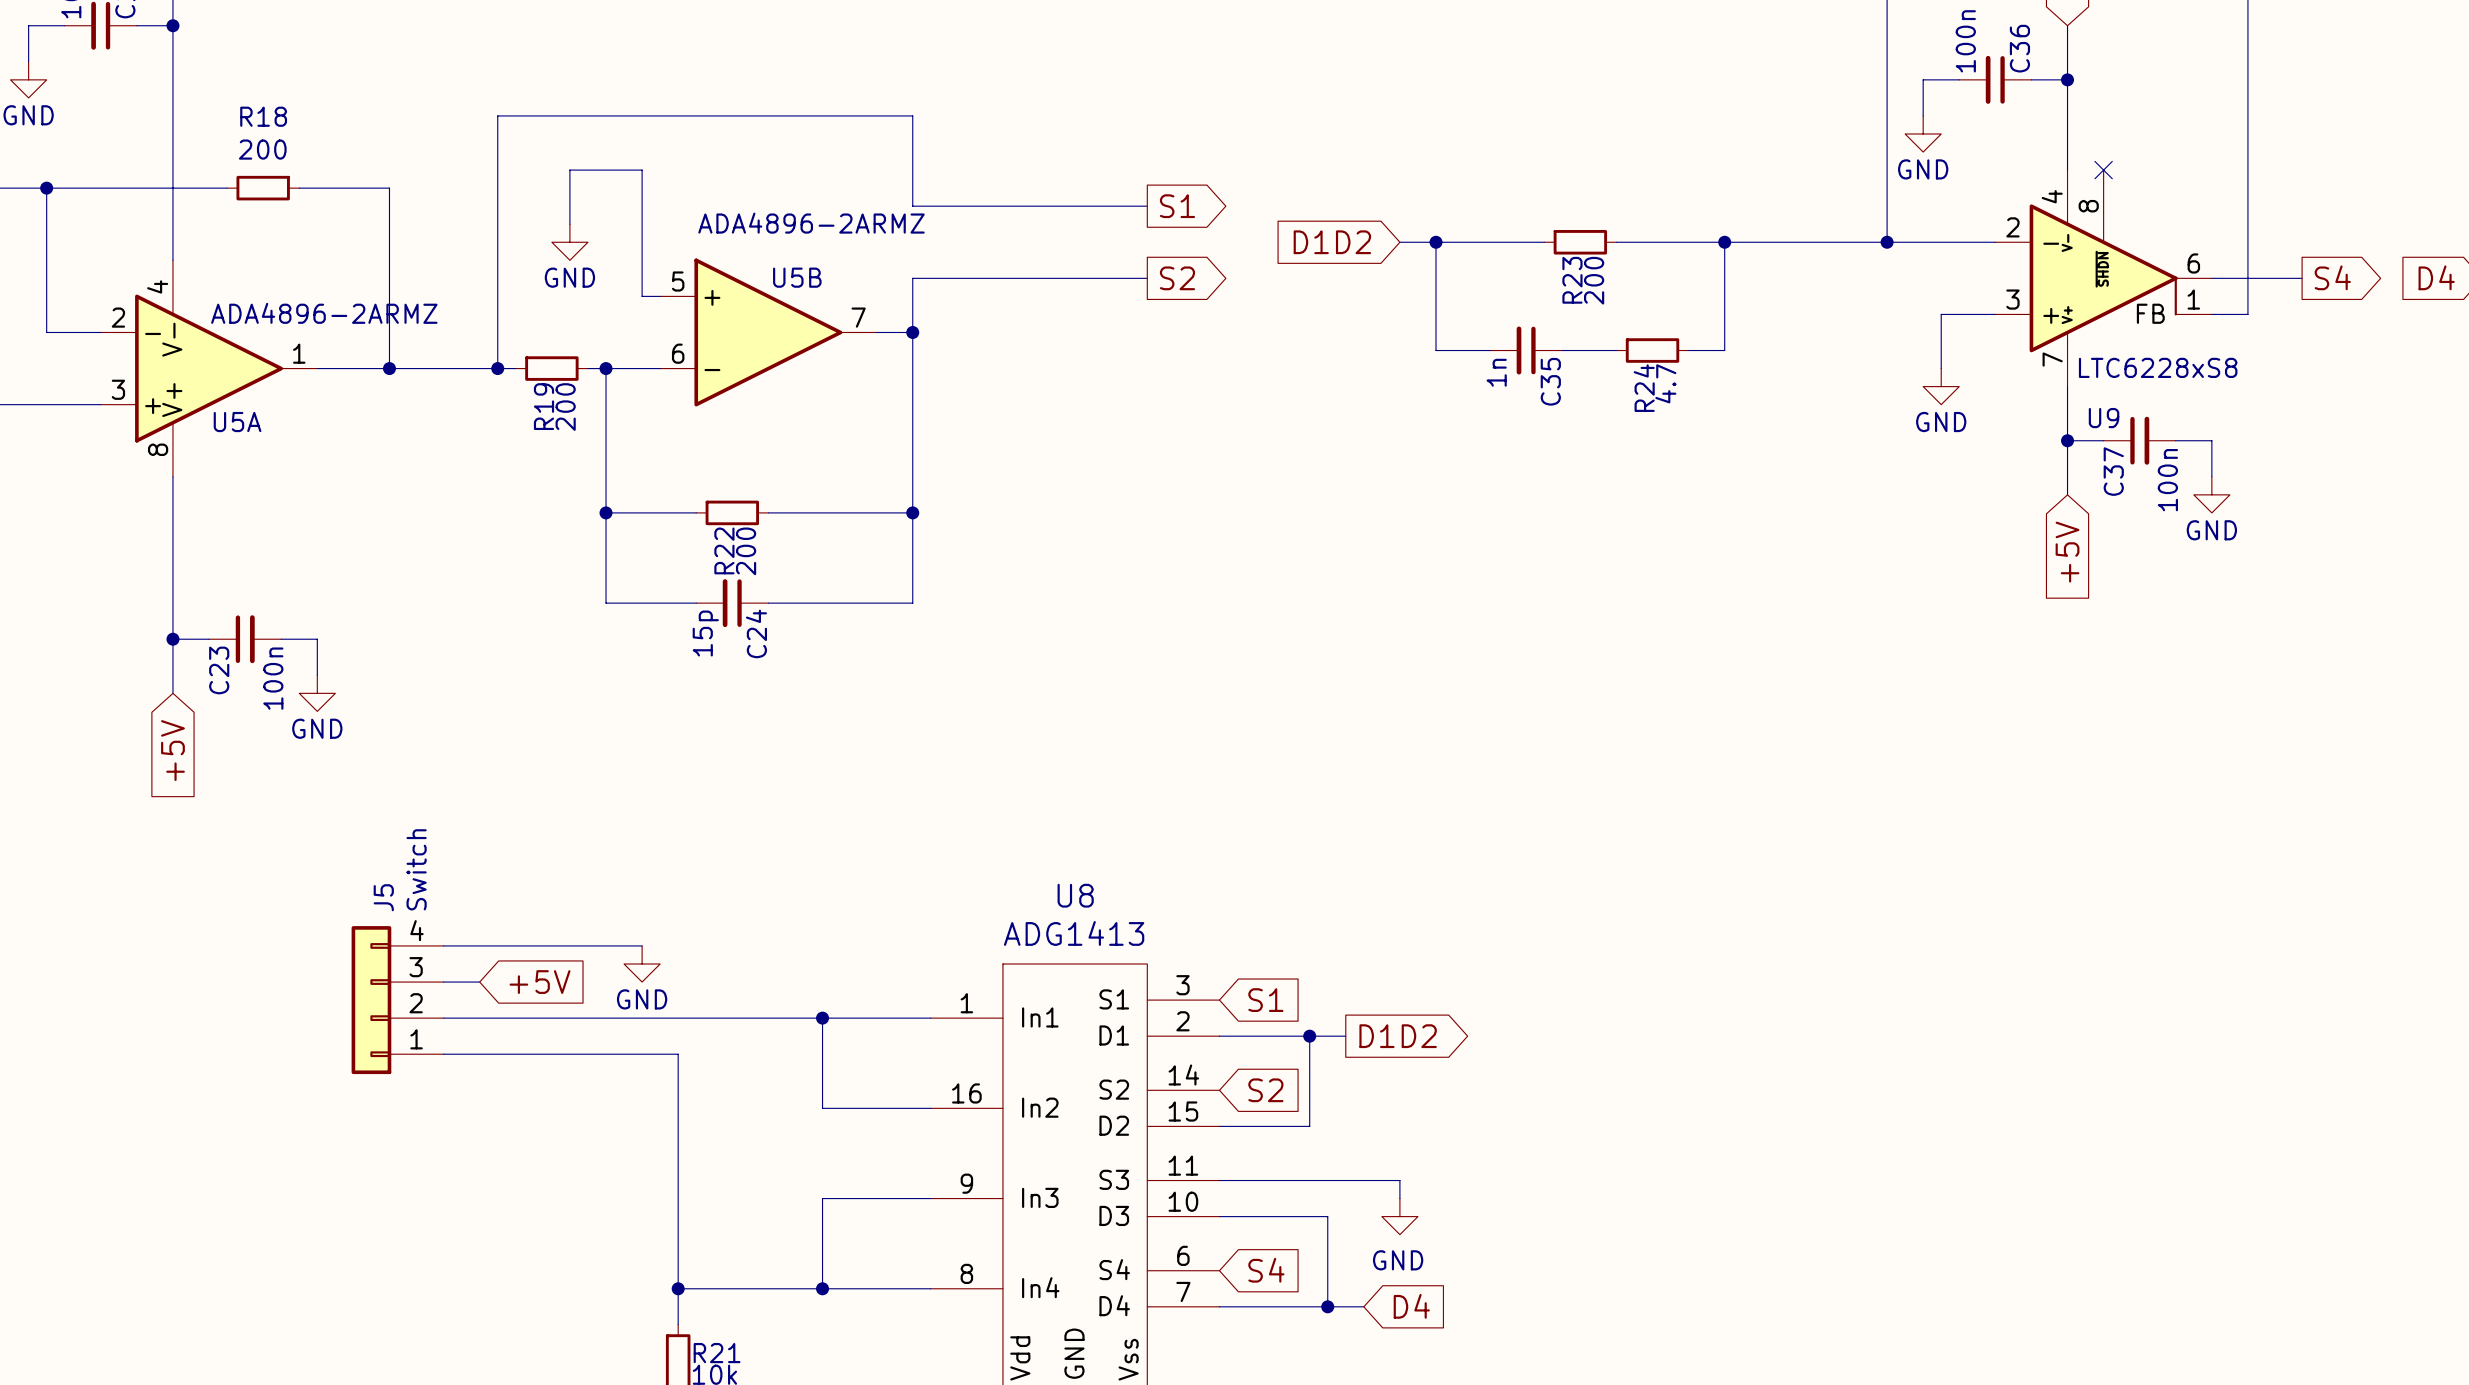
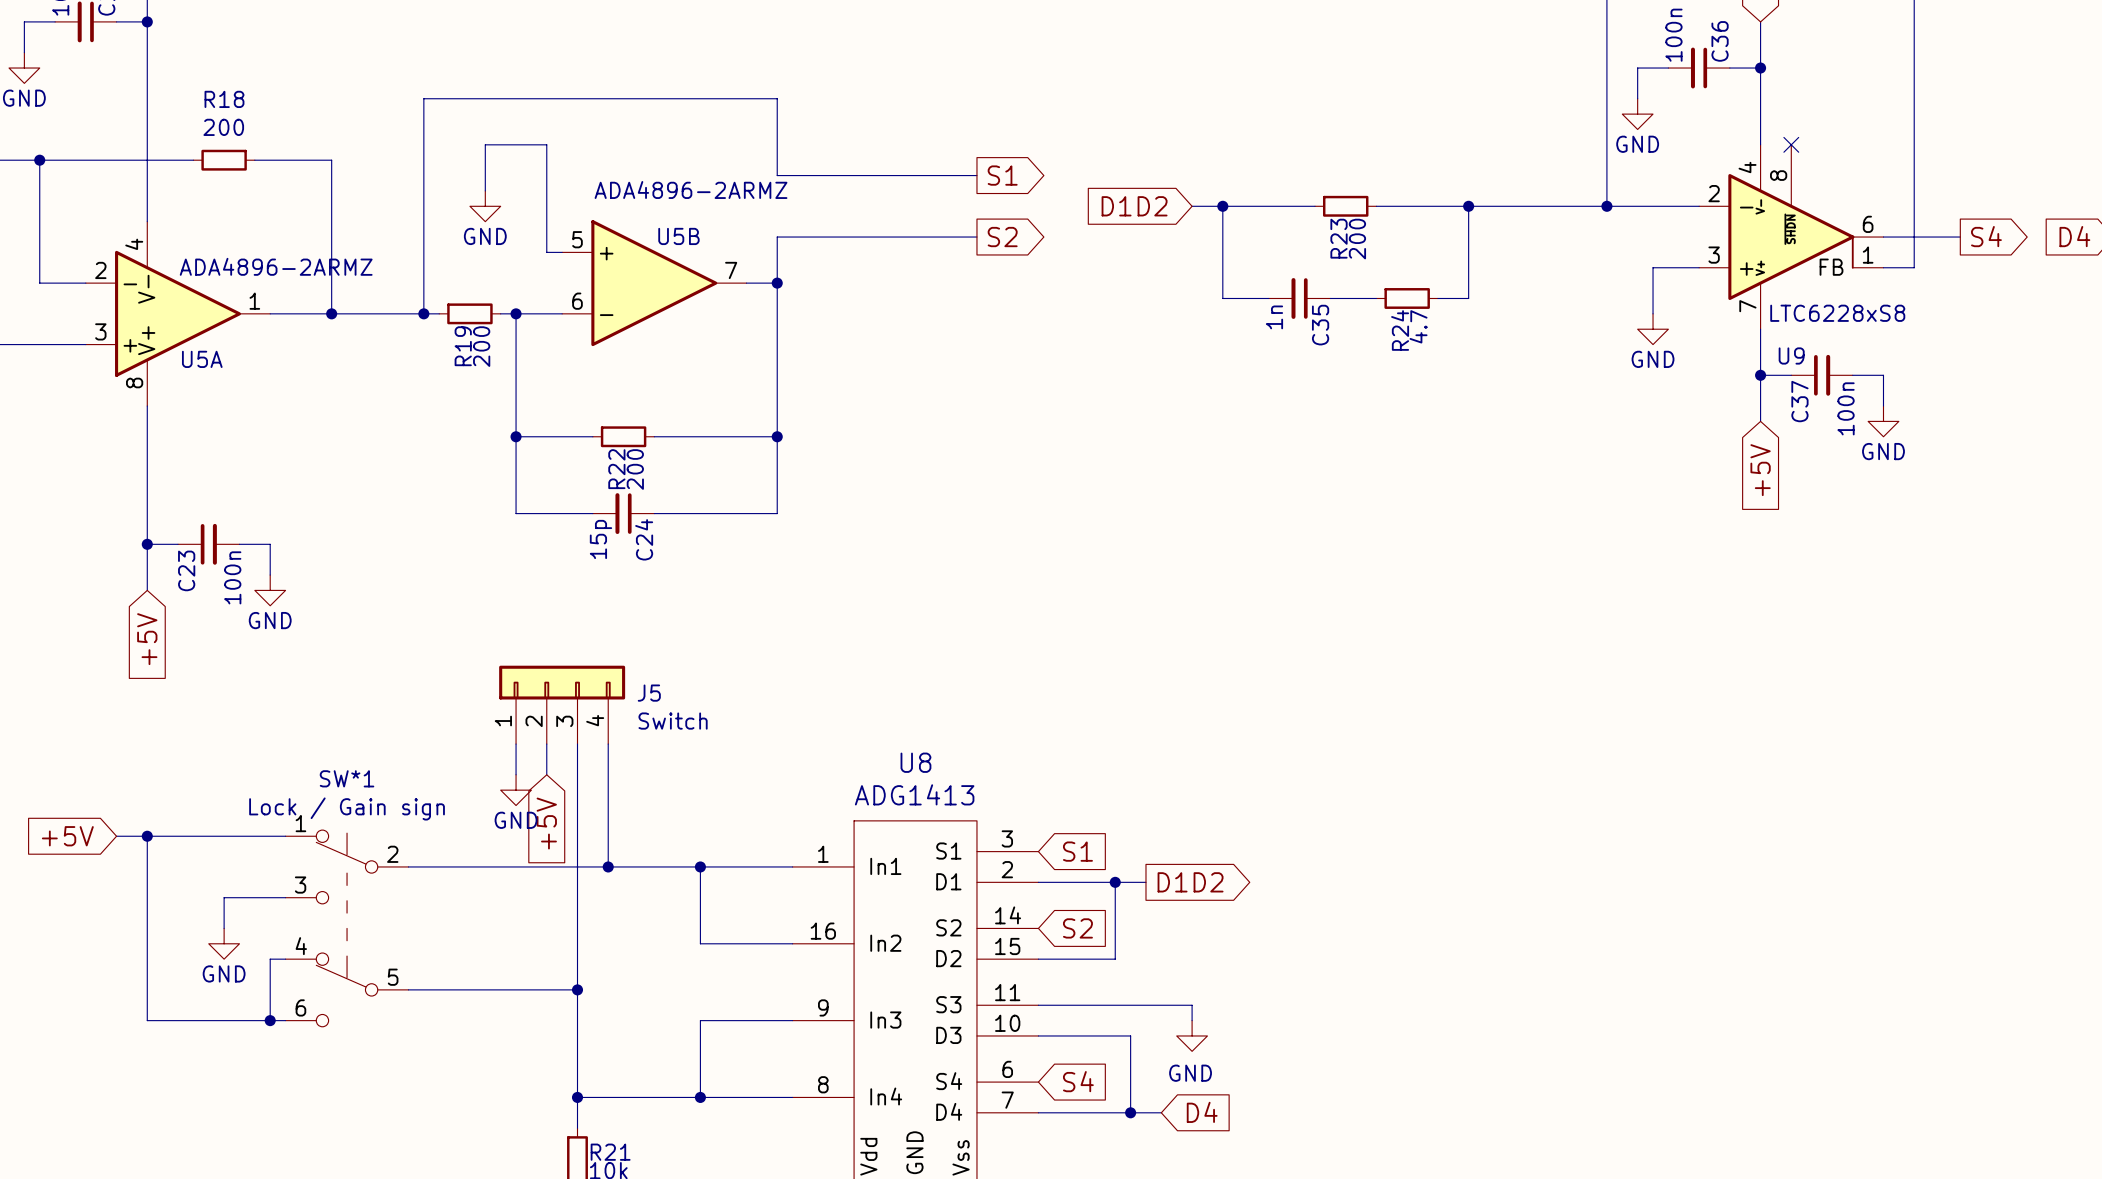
wire: none -> (516, 744) (516, 774)
wire: none -> (546, 744) (546, 774)
wire: none -> (608, 744) (608, 866)
wire: (443, 945) (642, 945) -> (408, 989) (577, 989)
power symbol position: GND (642, 964) -> GND (516, 790)
global label: none -> +5V (546, 823)
global label: none -> +5V (67, 836)
wire: none -> (116, 836) (285, 836)
wire: none -> (147, 836) (147, 1020) (285, 1020)
junction: none -> (147, 836)
wire: (443, 982) (479, 982) -> none
global label: +5V (540, 982) -> none
J5 rotation: 0° (371, 1000) -> 90° clockwise (562, 682)
J5 position: (397, 1000) -> (562, 704)
junction: none -> (608, 866)
wire: none -> (285, 897) (224, 897) (224, 928)
wire: (443, 1054) (678, 1054) -> (577, 744) (577, 897)
SW*1: none -> Lock / Gain sign (347, 928)
power symbol: none -> GND (224, 943)
wire: none -> (285, 959) (270, 959) (270, 1020)
junction: none -> (577, 989)
junction: none -> (270, 1020)

